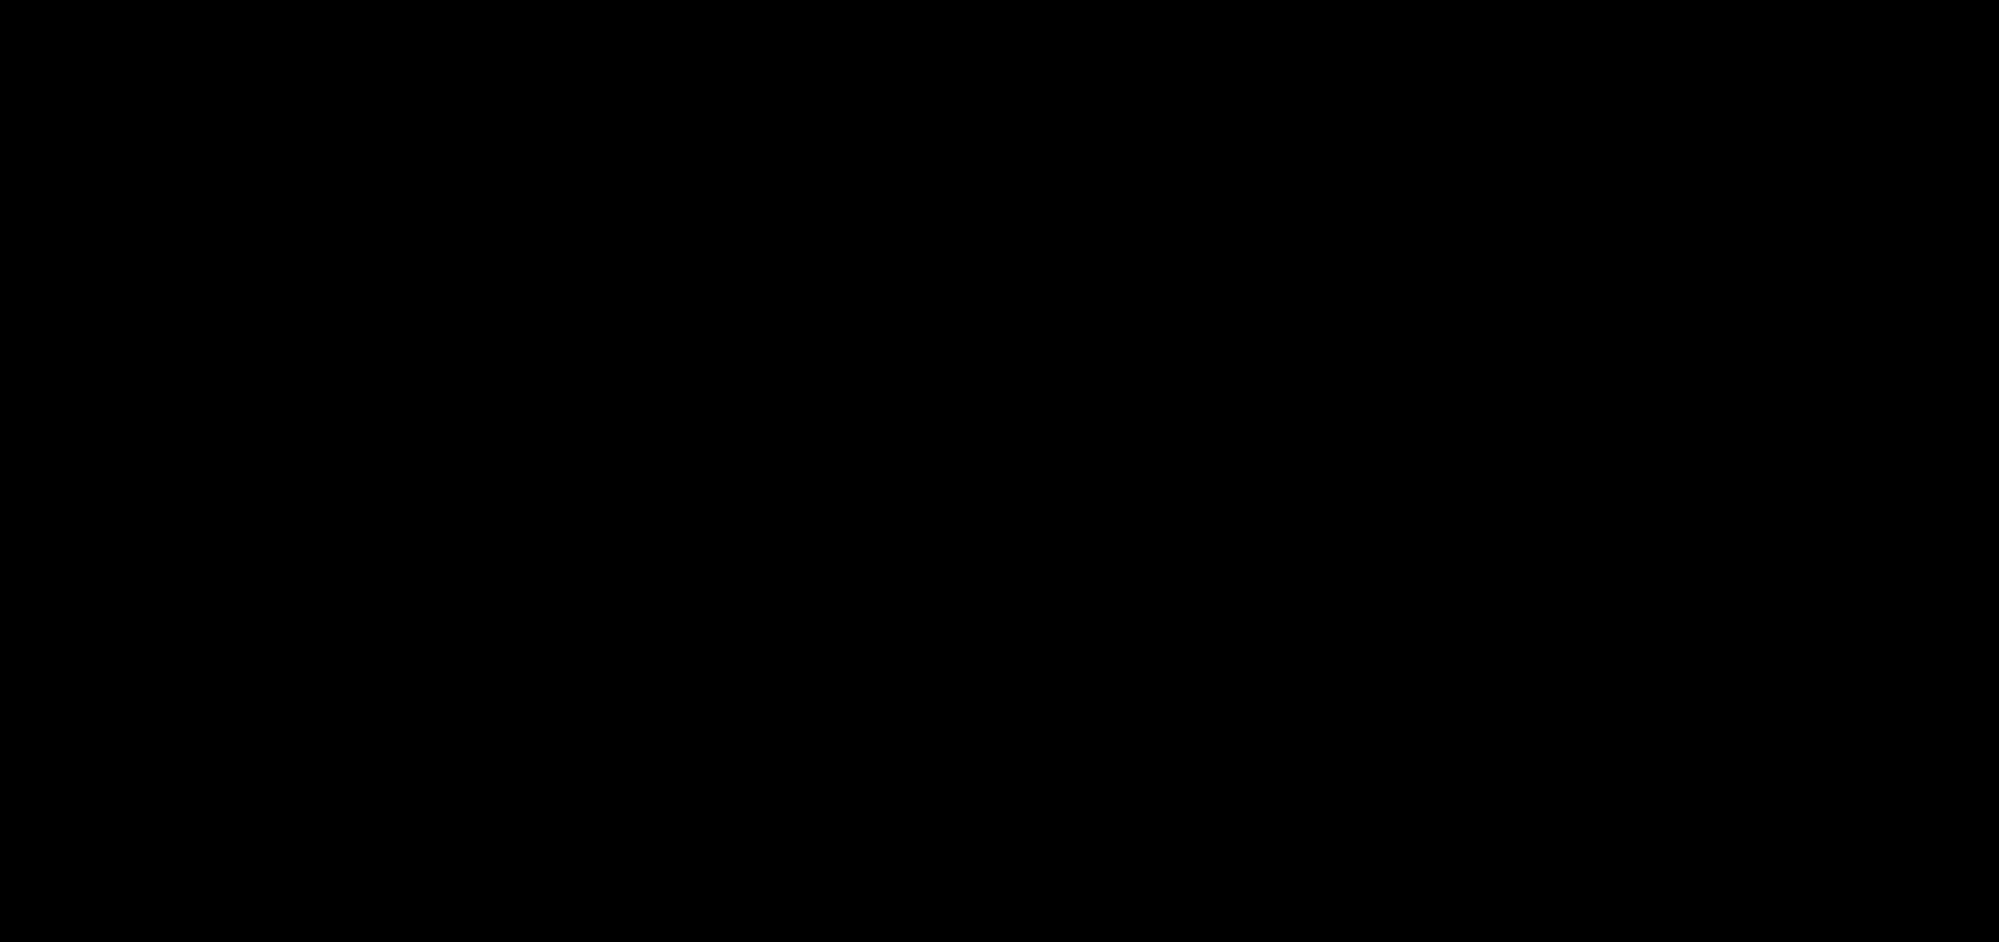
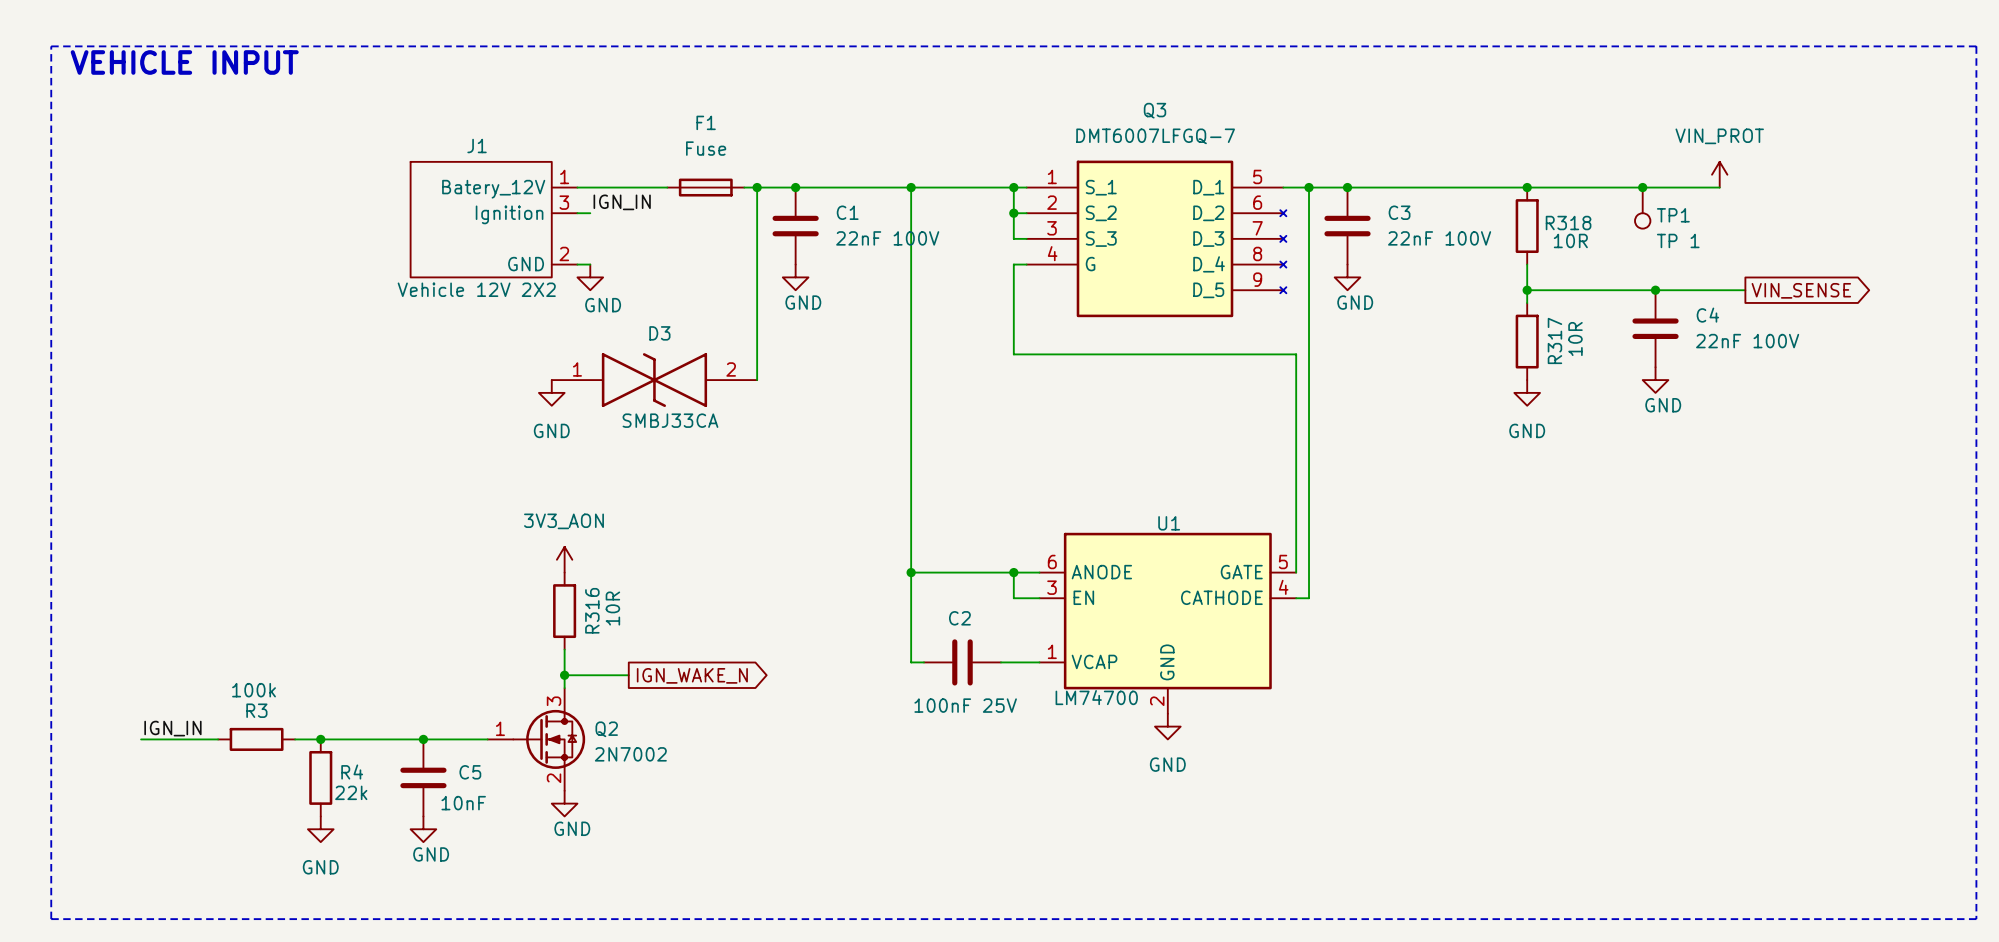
line: none -> (51, 46) (1976, 46) (1976, 919) (51, 919) (51, 46)
text: none -> VEHICLE INPUT (184, 62)
power symbol: none -> VIN_PROT (1719, 174)
wire: none -> (577, 187) (667, 187)
F1: none -> Fuse (705, 187)
wire: none -> (744, 187) (1026, 187)
wire: none -> (757, 187) (757, 380)
junction: none -> (757, 187)
junction: none -> (795, 187)
wire: none -> (911, 187) (911, 662) (923, 662)
junction: none -> (911, 187)
wire: none -> (1013, 187) (1013, 238) (1026, 238)
junction: none -> (1013, 187)
wire: none -> (1283, 187) (1719, 187)
wire: none -> (1309, 187) (1309, 598) (1296, 598)
junction: none -> (1309, 187)
junction: none -> (1347, 187)
junction: none -> (1527, 187)
junction: none -> (1642, 187)
label: none -> IGN_IN (622, 202)
TP1: none -> TP 1 (1642, 208)
wire: none -> (577, 213) (590, 213)
wire: none -> (1013, 213) (1026, 213)
junction: none -> (1013, 213)
J1: none -> Vehicle 12V 2X2 (494, 219)
C1: none -> 22nF 100V (795, 226)
C3: none -> 22nF 100V (1347, 226)
R318: none -> 10R (1527, 226)
Q3: none -> DMT6007LFGQ-7 (1156, 238)
wire: none -> (577, 264) (590, 264)
wire: none -> (1026, 264) (1013, 264) (1013, 354) (1296, 354) (1296, 572)
wire: none -> (1527, 264) (1527, 303)
power symbol: none -> GND (590, 277)
power symbol: none -> GND (795, 277)
power symbol: none -> GND (1347, 277)
wire: none -> (1527, 290) (1745, 290)
junction: none -> (1527, 290)
junction: none -> (1655, 290)
global label: none -> VIN_SENSE (1801, 290)
C4: none -> 22nF 100V (1655, 328)
R317: none -> 10R (1527, 341)
D3: none -> SMBJ33CA (654, 380)
power symbol: none -> GND (1655, 380)
power symbol: none -> GND (551, 392)
power symbol: none -> GND (1527, 392)
power symbol: none -> 3V3_AON (564, 559)
wire: none -> (911, 572) (1039, 572)
junction: none -> (911, 572)
wire: none -> (1013, 572) (1013, 598) (1039, 598)
junction: none -> (1013, 572)
R316: none -> 10R (564, 611)
U1: none -> LM74700 (1167, 623)
wire: none -> (564, 649) (564, 688)
C2: none -> 100nF 25V (962, 662)
wire: none -> (1000, 662) (1039, 662)
wire: none -> (564, 675) (628, 675)
junction: none -> (564, 675)
global label: none -> IGN_WAKE_N (692, 675)
power symbol: none -> GND (1167, 726)
label: none -> IGN_IN (172, 728)
wire: none -> (141, 739) (218, 739)
R3: none -> 100k (256, 739)
wire: none -> (295, 739) (487, 739)
junction: none -> (320, 739)
junction: none -> (423, 739)
Q2: none -> 2N7002 (536, 739)
R4: none -> 22k (320, 777)
C5: none -> 10nF (423, 777)
power symbol: none -> GND (564, 803)
power symbol: none -> GND (320, 829)
power symbol: none -> GND (423, 829)

